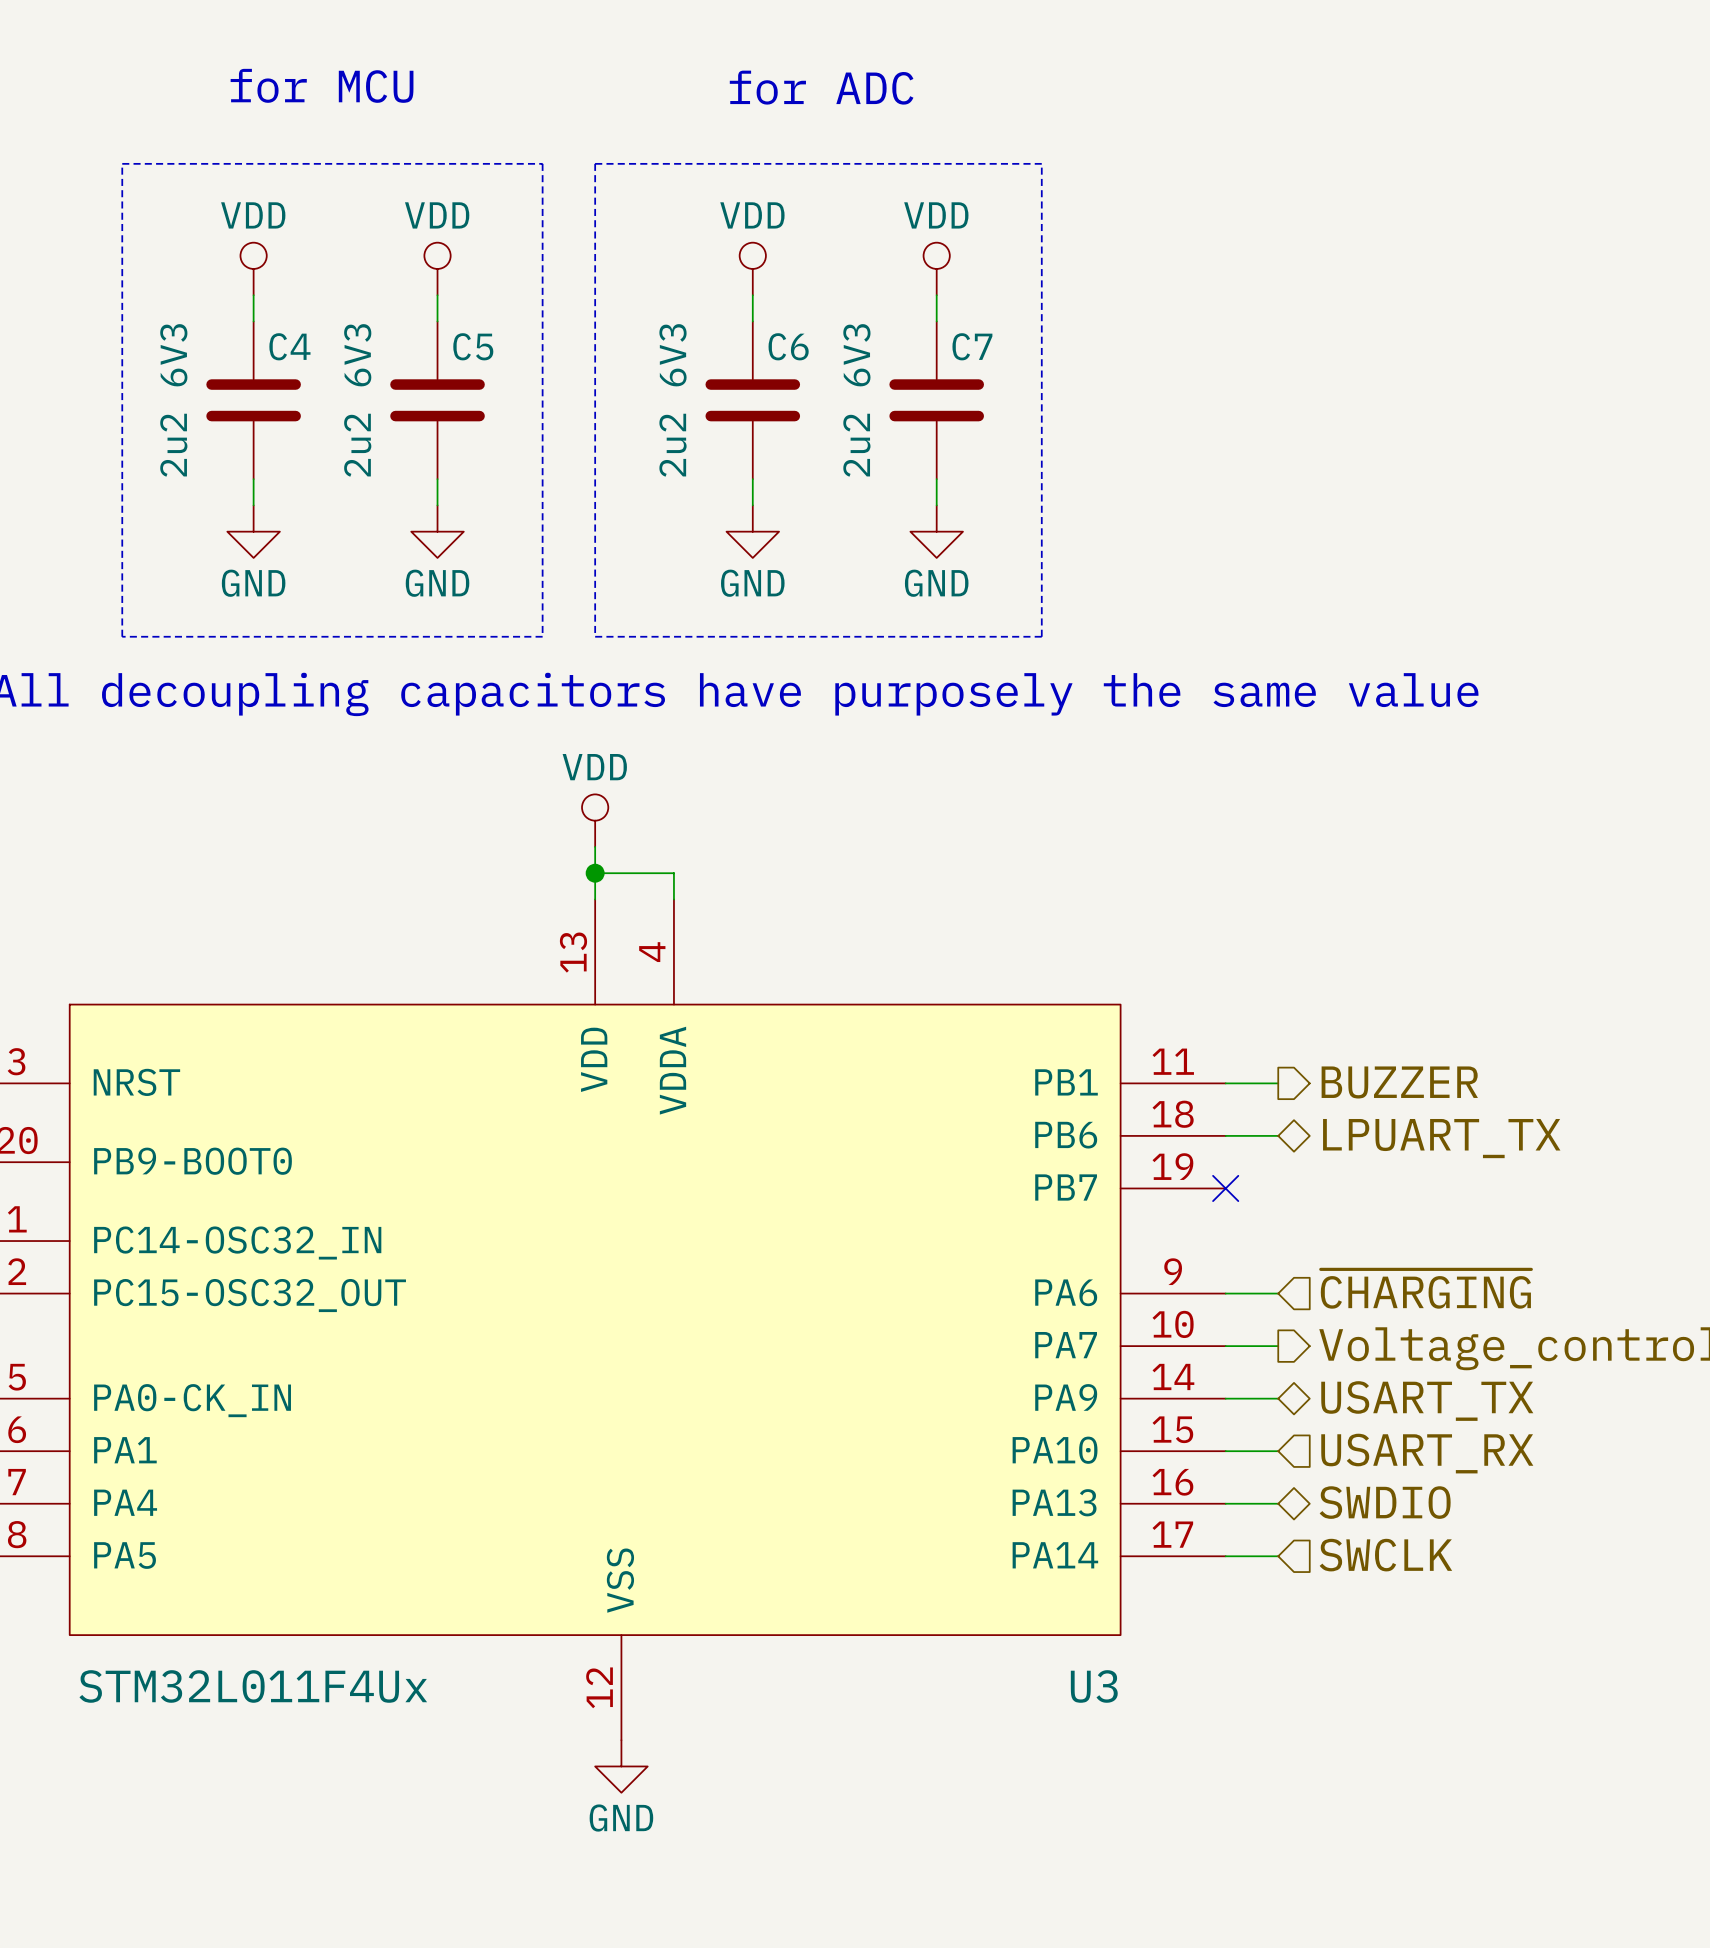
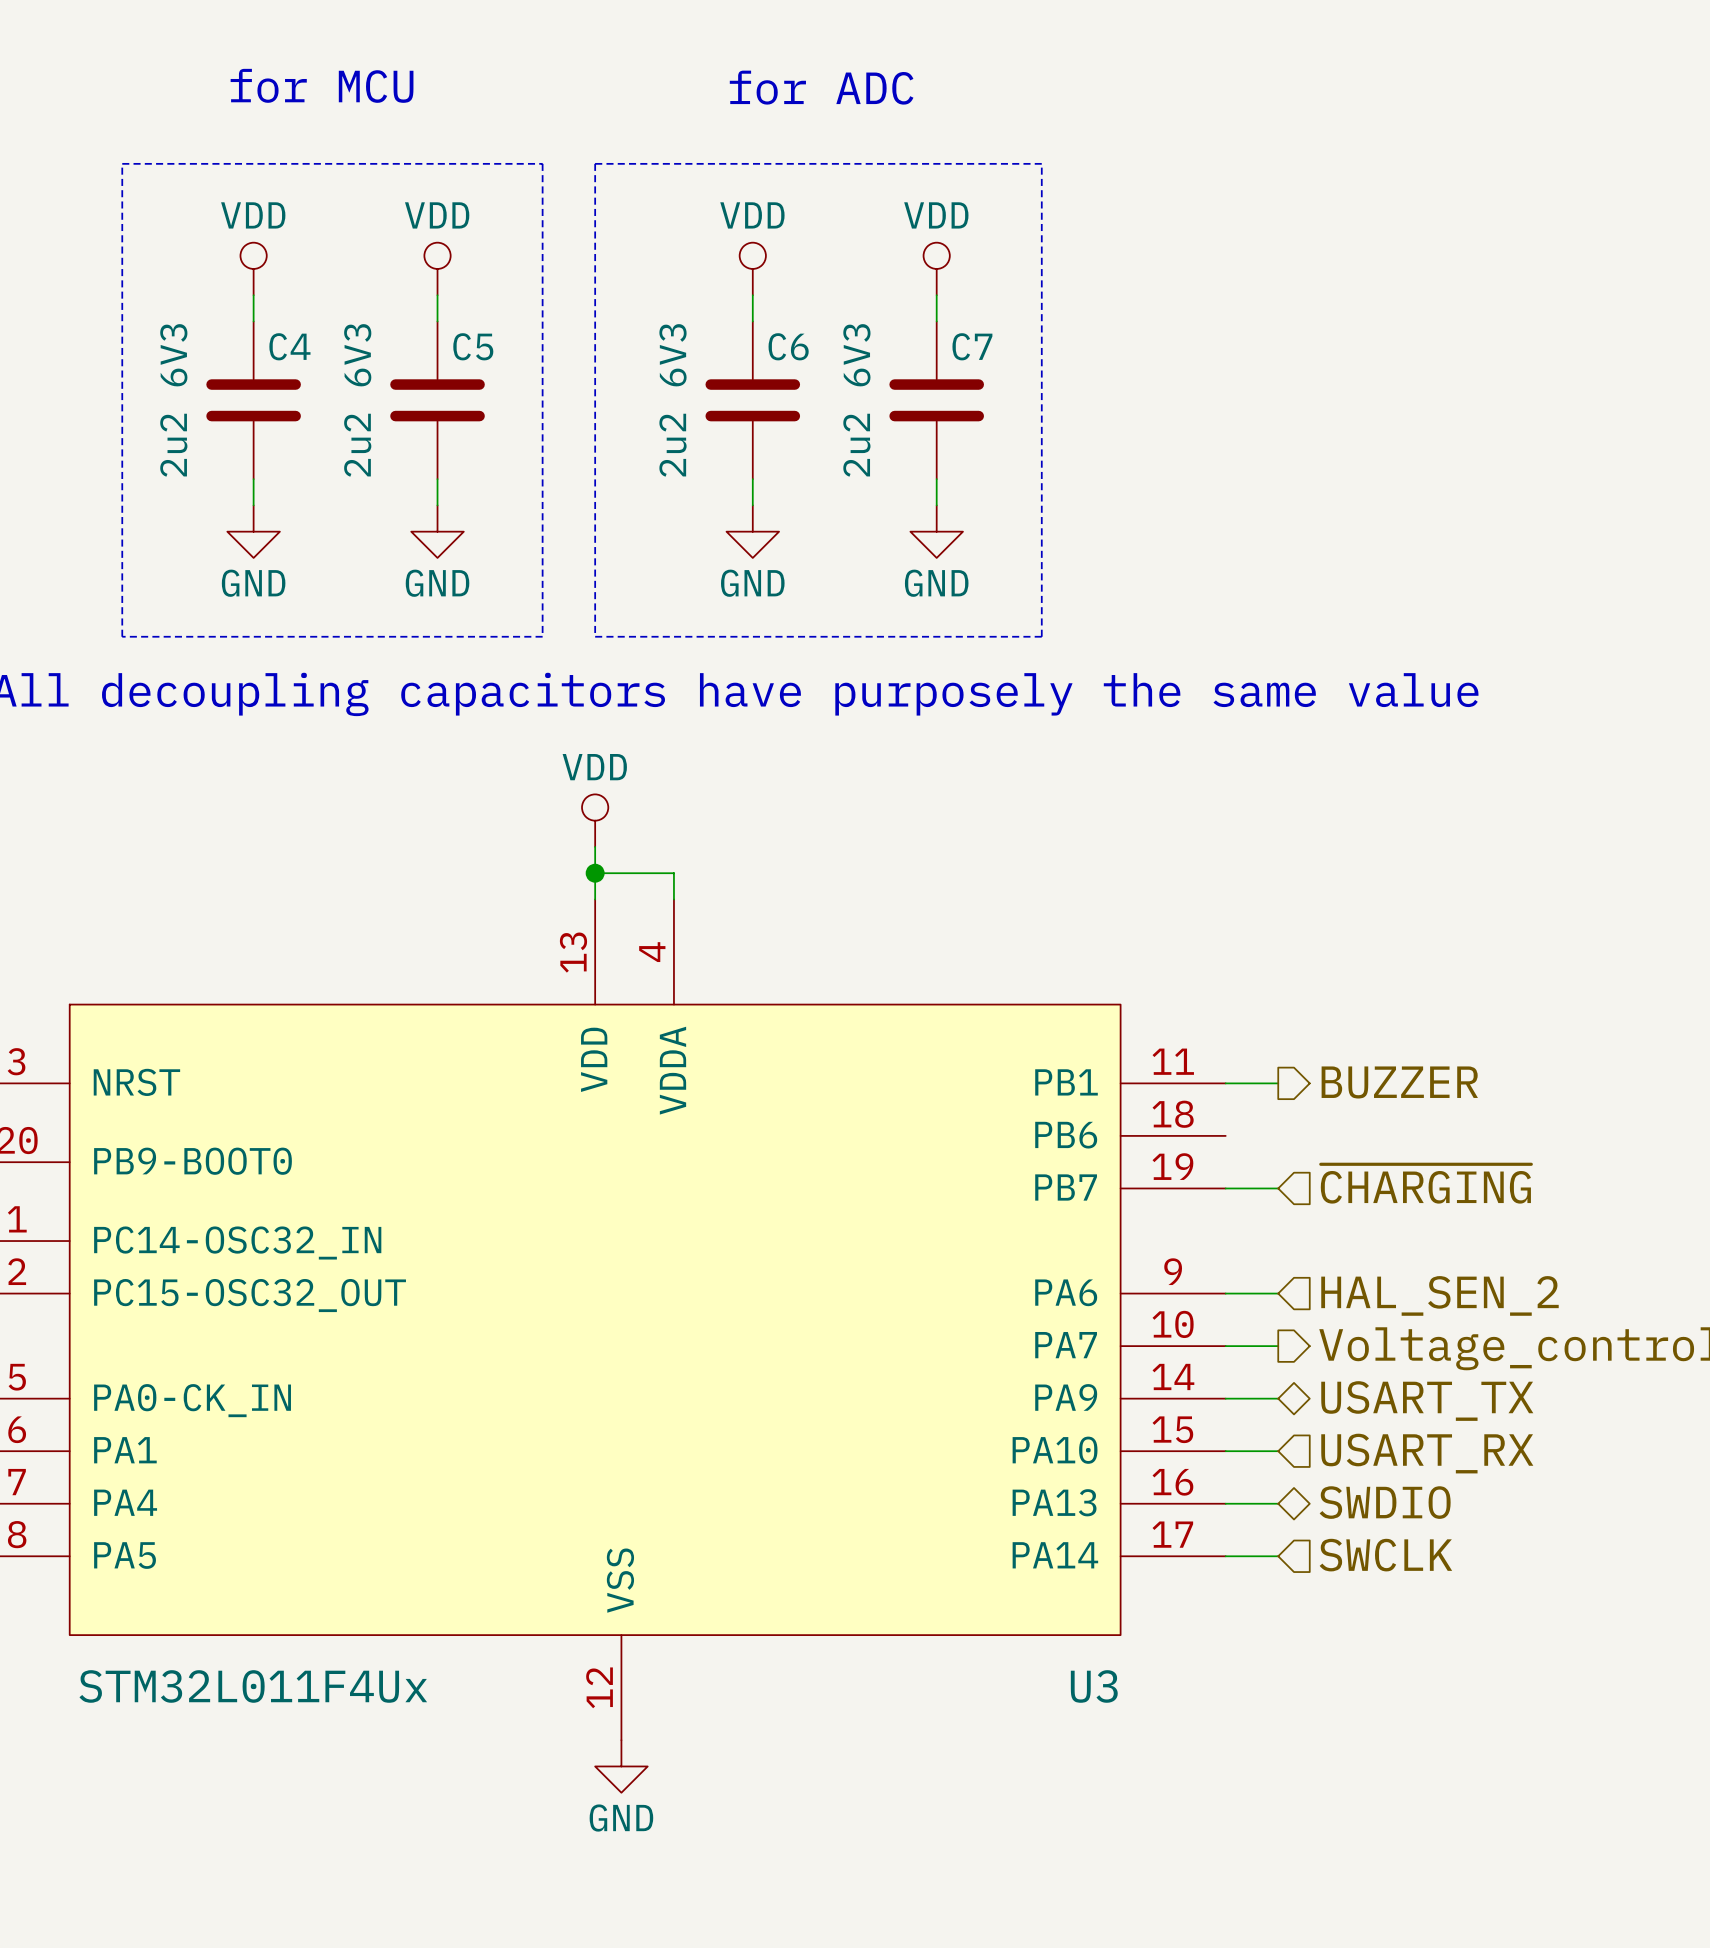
wire: (1225, 1135) (1278, 1135) -> (1225, 1188) (1278, 1188)
hierarchical label: LPUART_TX (1441, 1138) -> none
hierarchical label: none -> ~{CHARGING} (1426, 1183)
no-connect mark: (1225, 1188) -> none
hierarchical label: ~{CHARGING} (1426, 1289) -> HAL_SEN_2 (1439, 1295)

